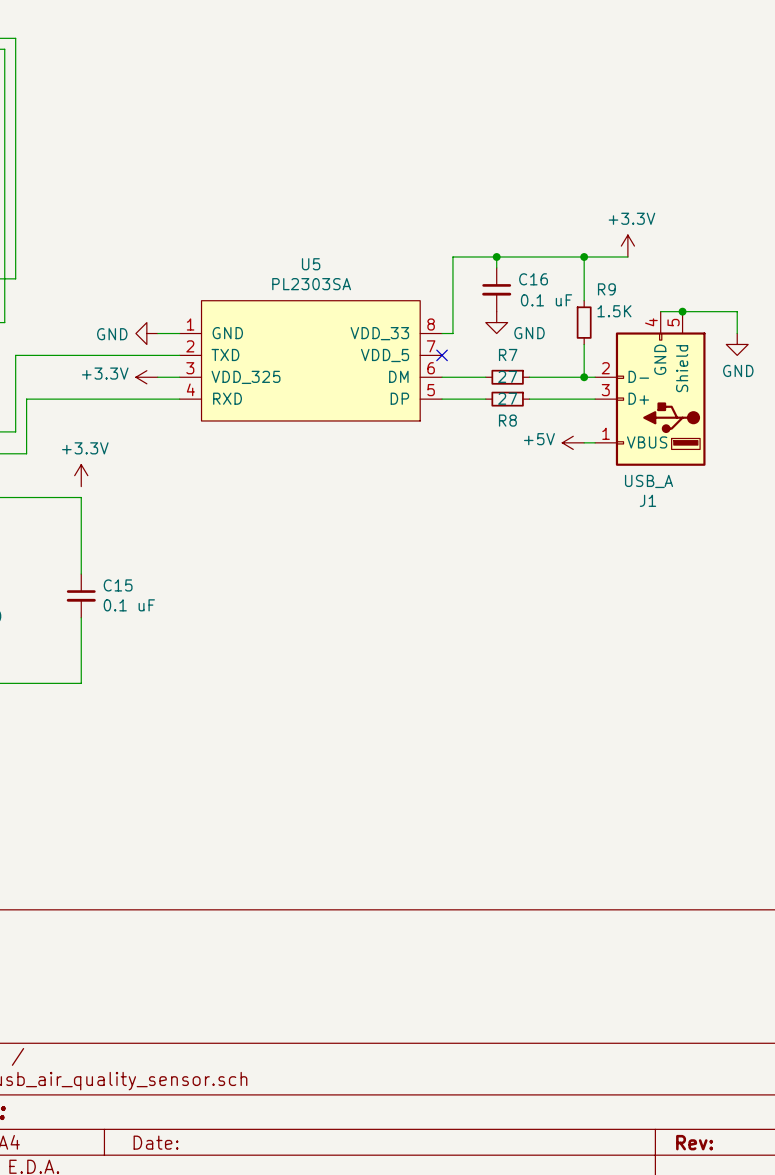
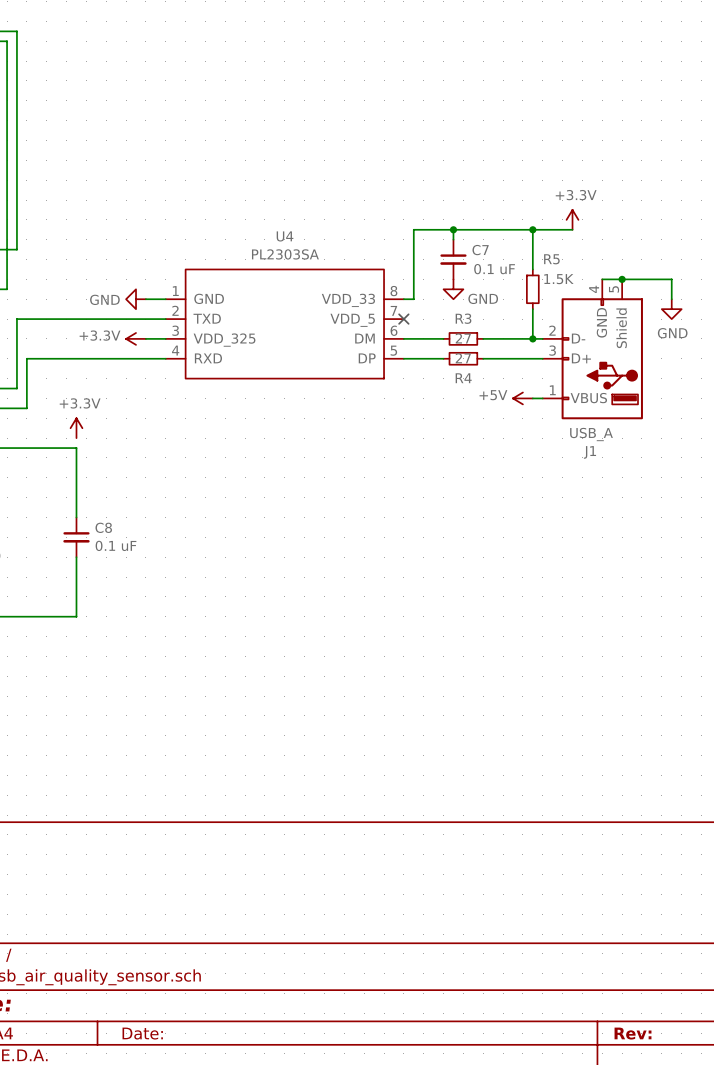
U5 name: U5 (311, 264) -> U4 (285, 236)
C16 name: C16 (533, 279) -> C7 (480, 250)
R9 name: R9 (606, 289) -> R5 (551, 259)
R7 name: R7 (508, 354) -> R3 (463, 318)
R8 name: R8 (507, 420) -> R4 (463, 378)
C15 name: C15 (118, 585) -> C8 (103, 527)

